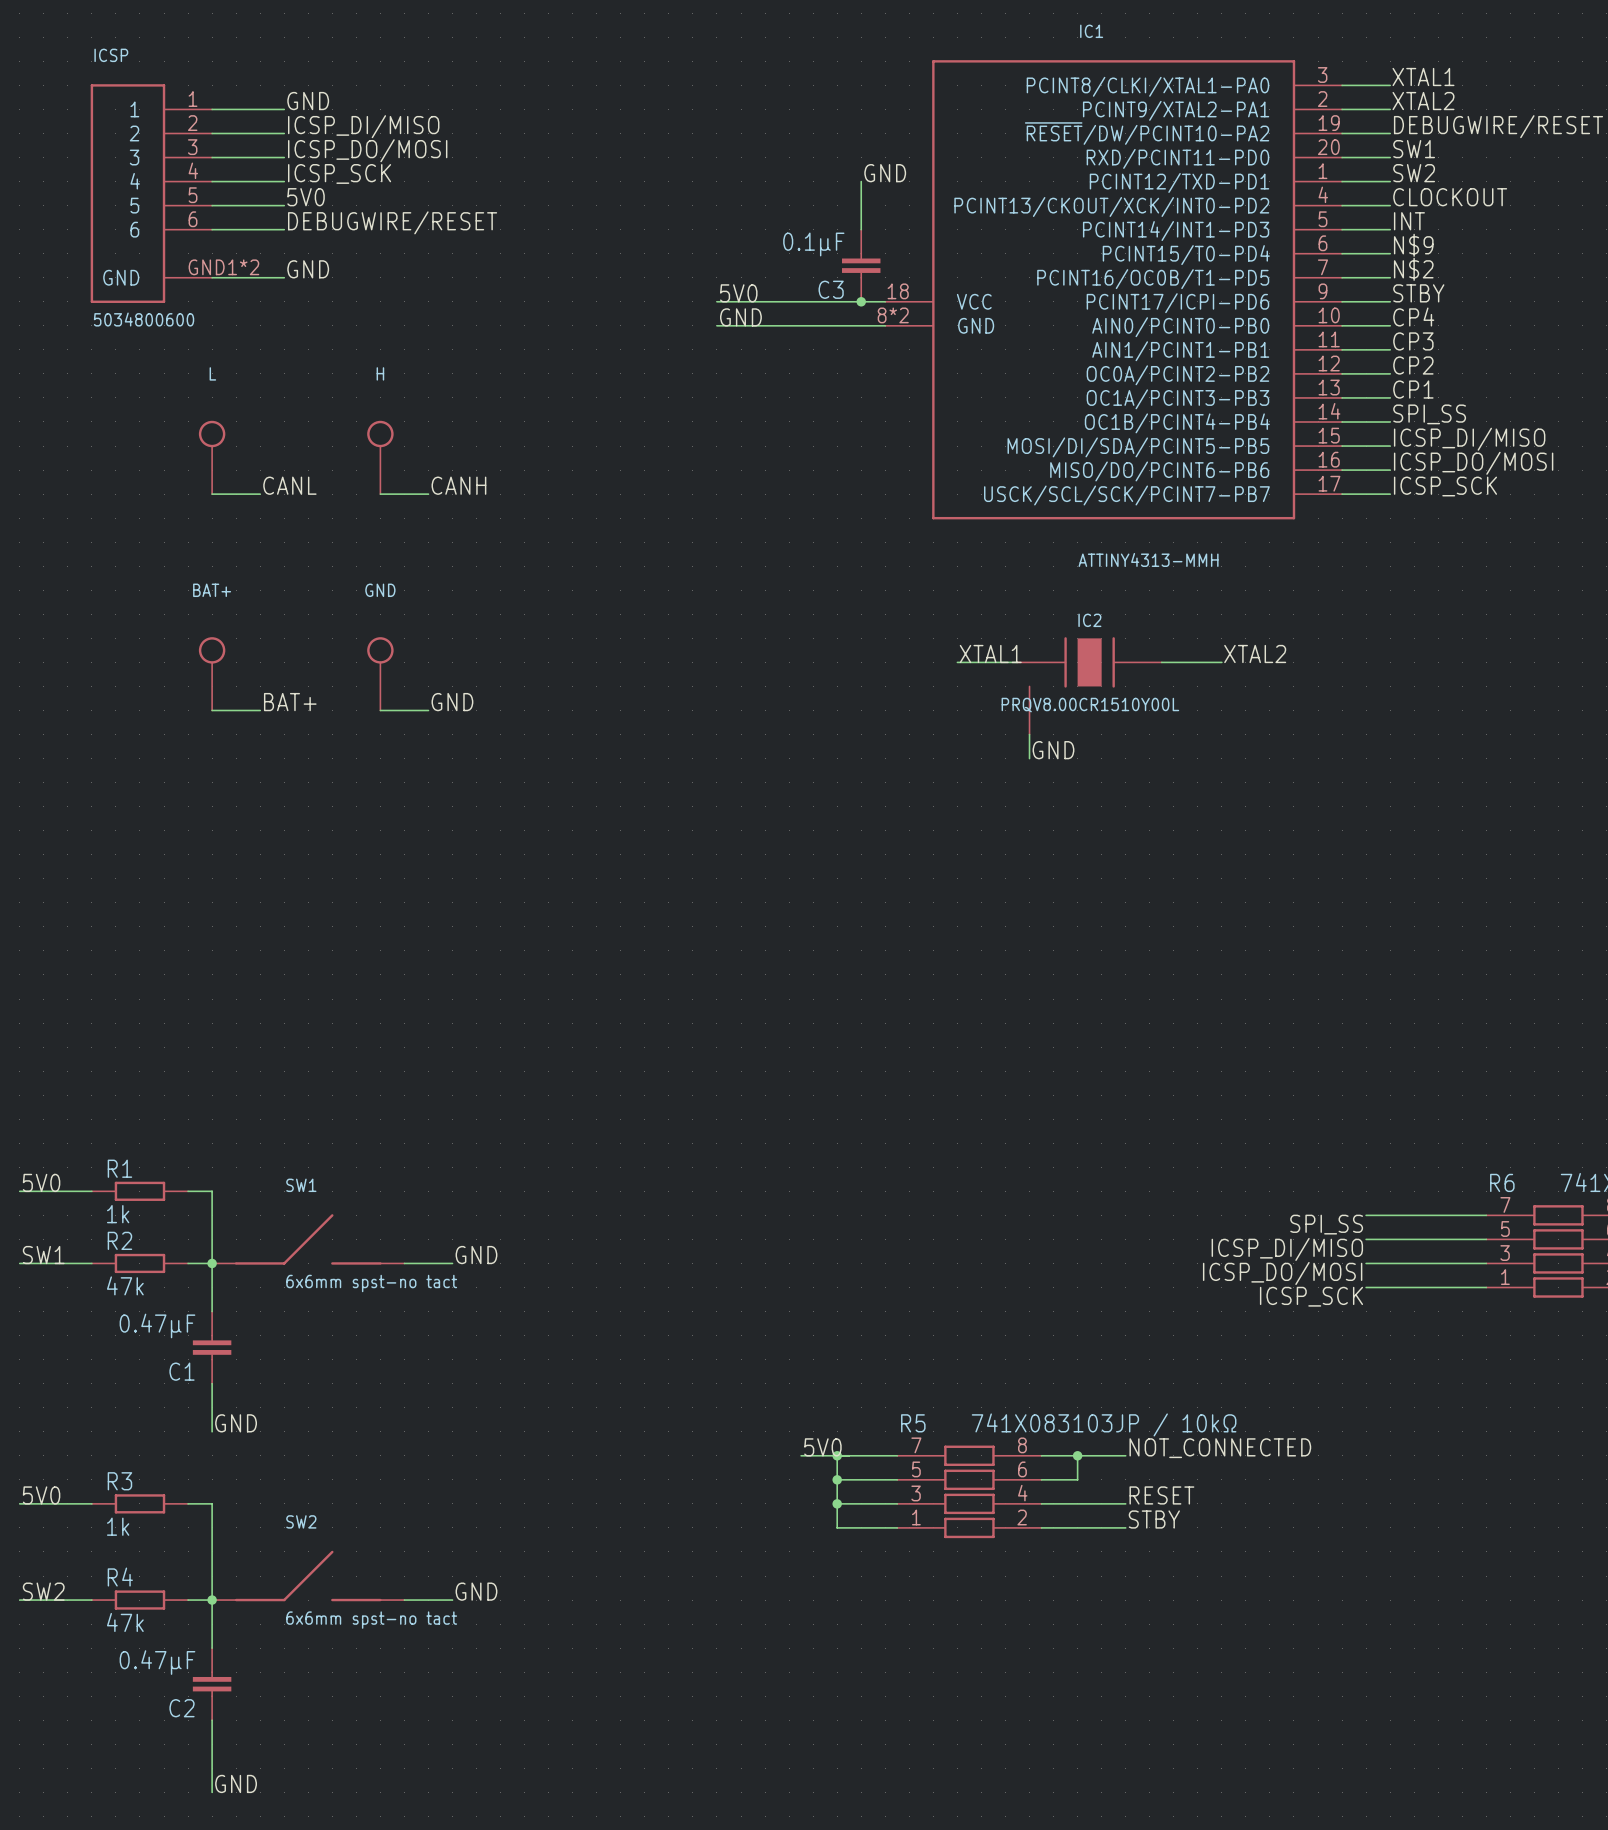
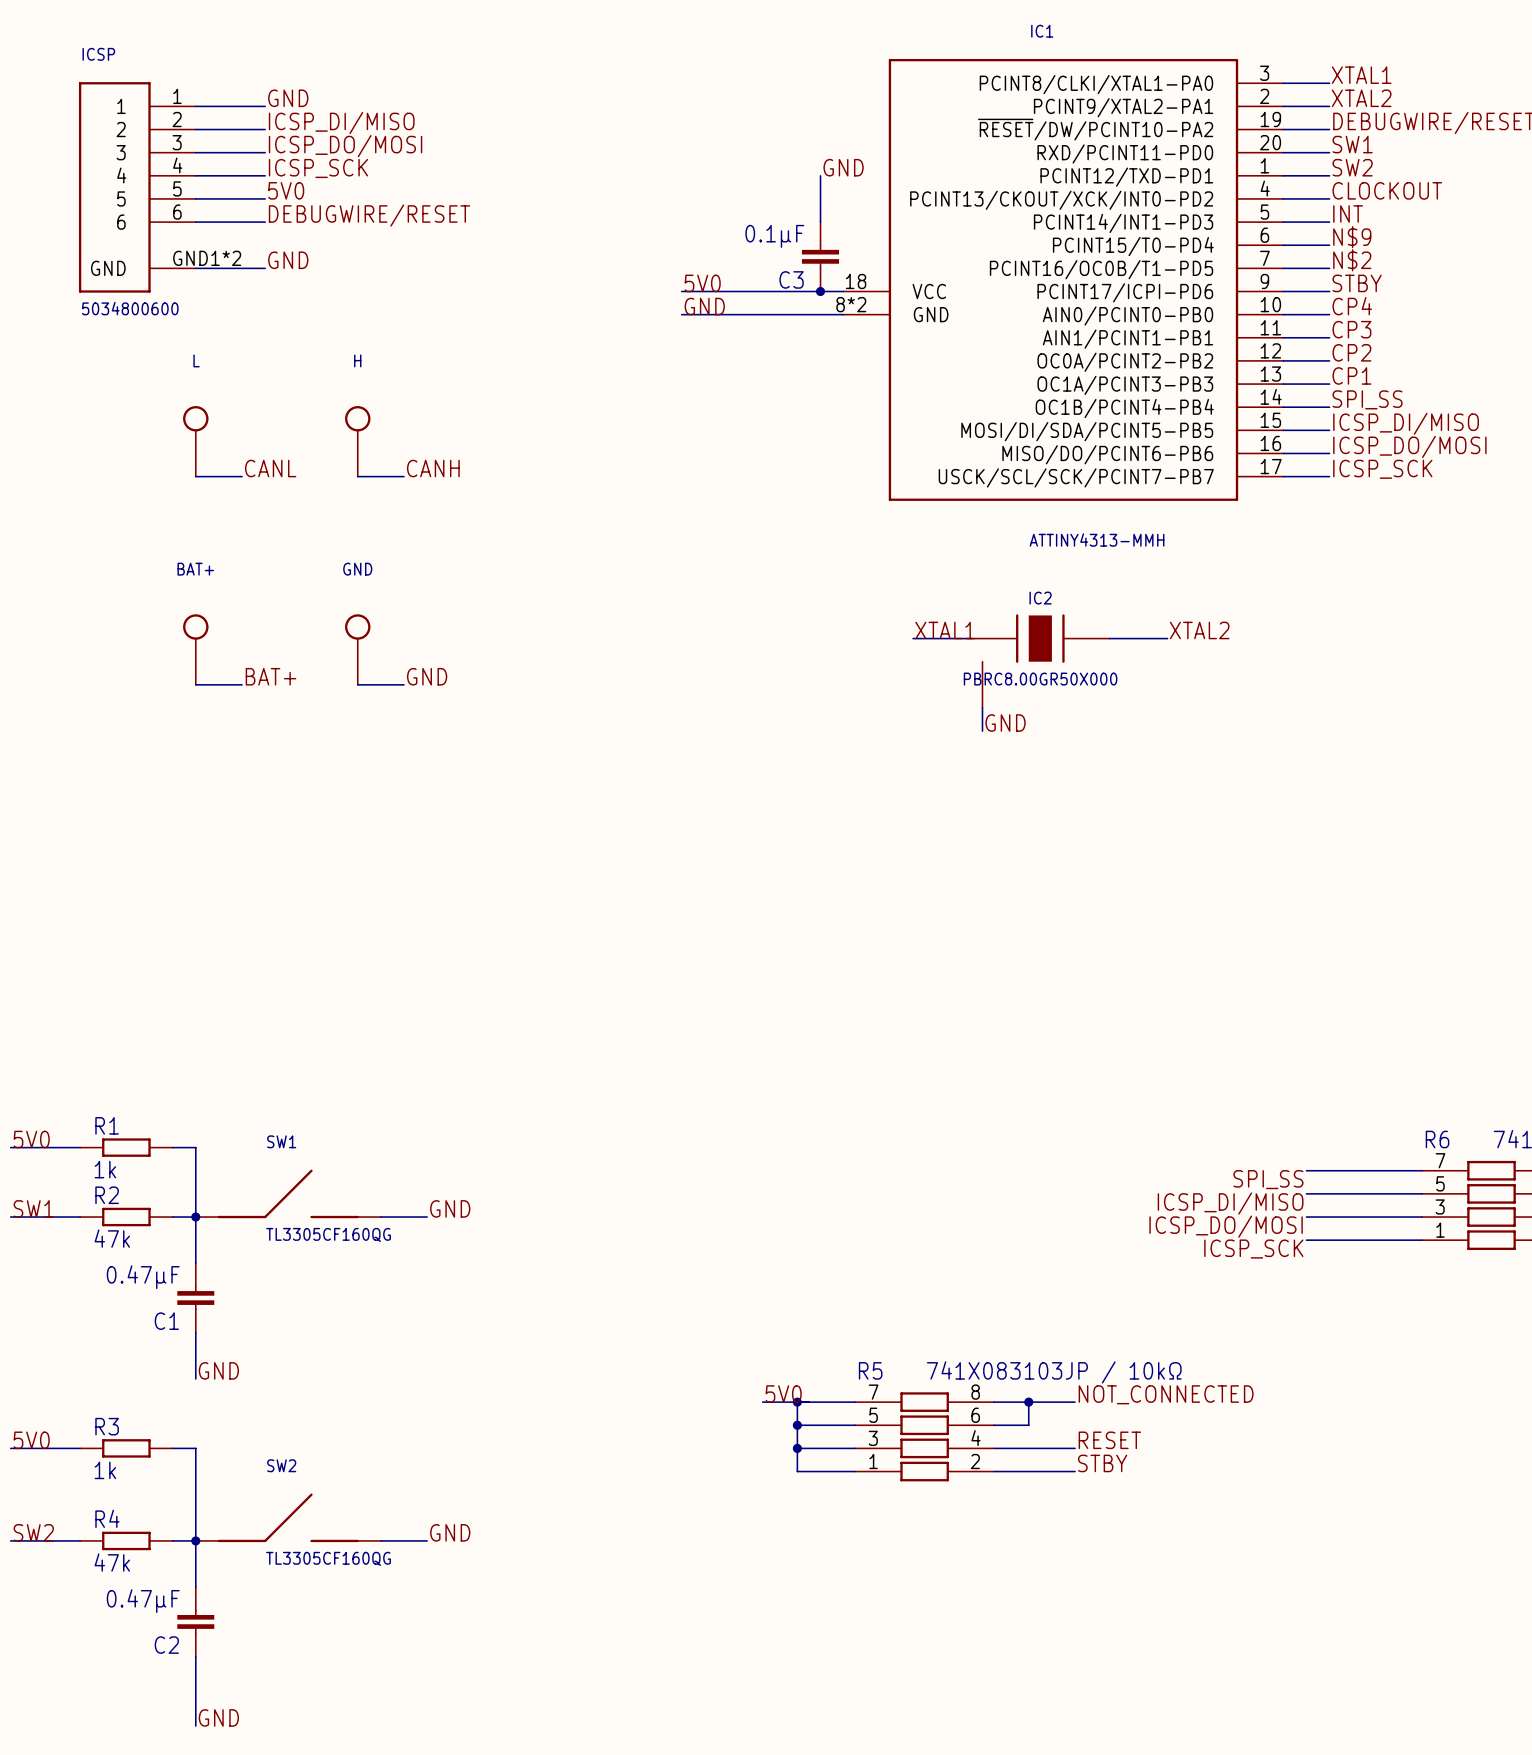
IC2 value: PRQV8.00CR1510Y00L (1090, 705) -> PBRC8.00GR50X000 (1040, 679)
SW1 value: 6x6mm spst-no tact (371, 1283) -> TL3305CF160QG (328, 1234)
SW2 value: 6x6mm spst-no tact (371, 1620) -> TL3305CF160QG (328, 1558)

